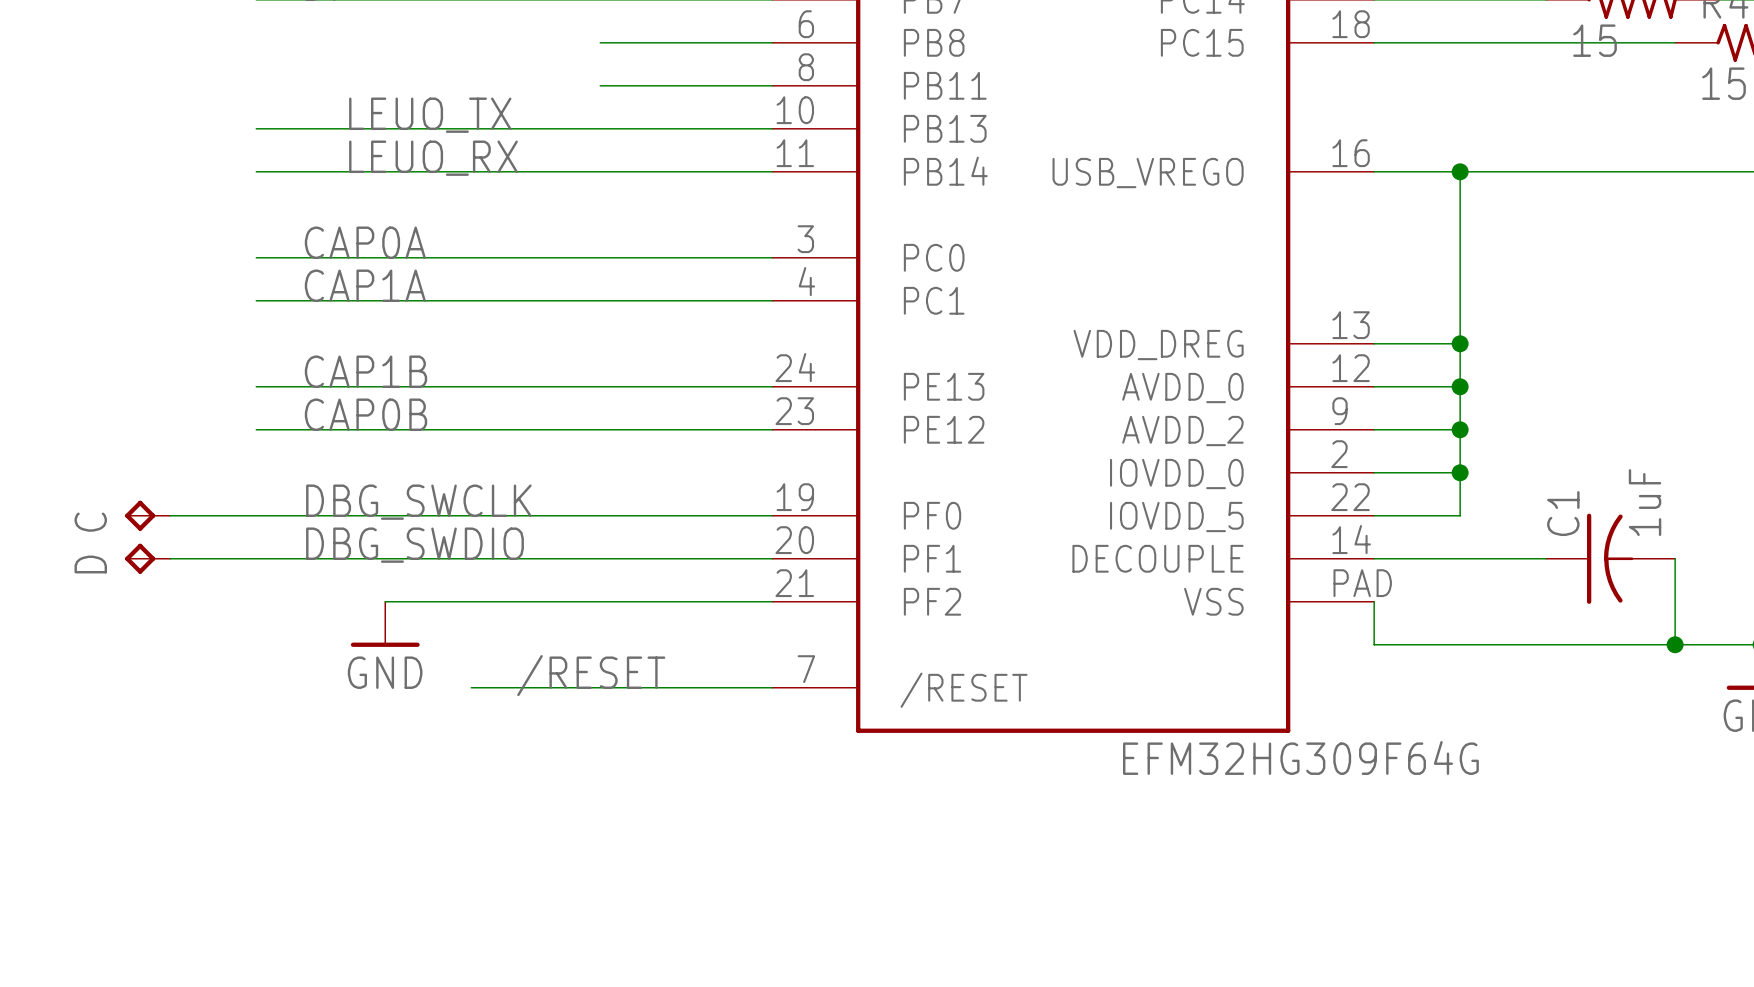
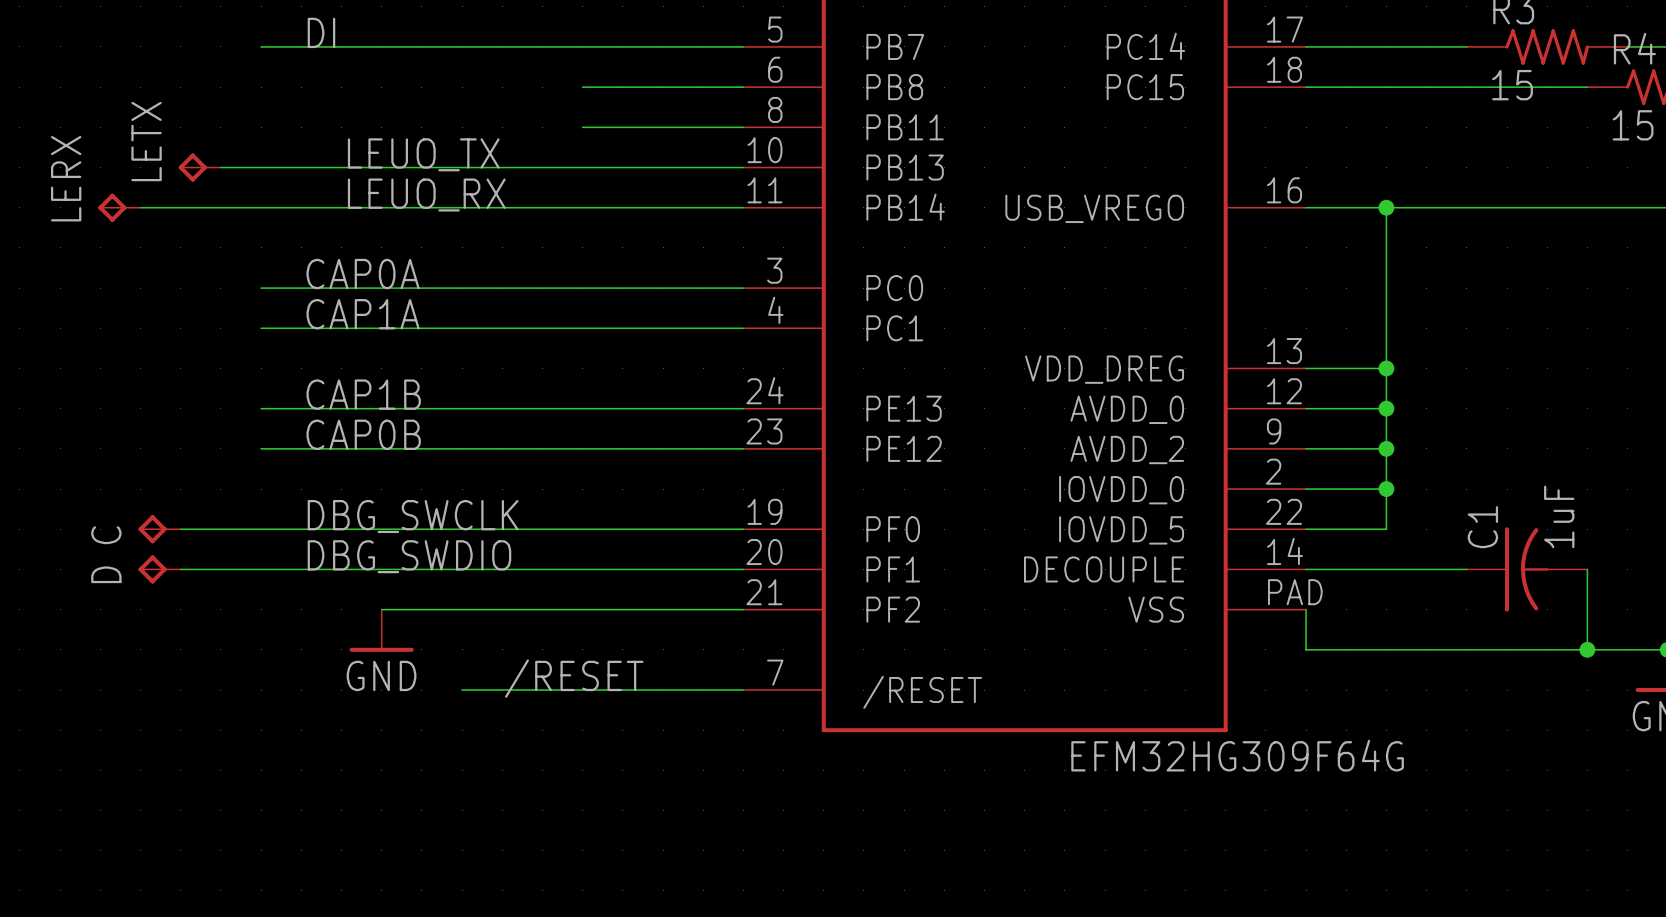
LETX: none -> (199, 167)
wire: none -> (220, 167) (261, 167)
LERX: none -> (119, 207)
wire: none -> (140, 207) (261, 207)

